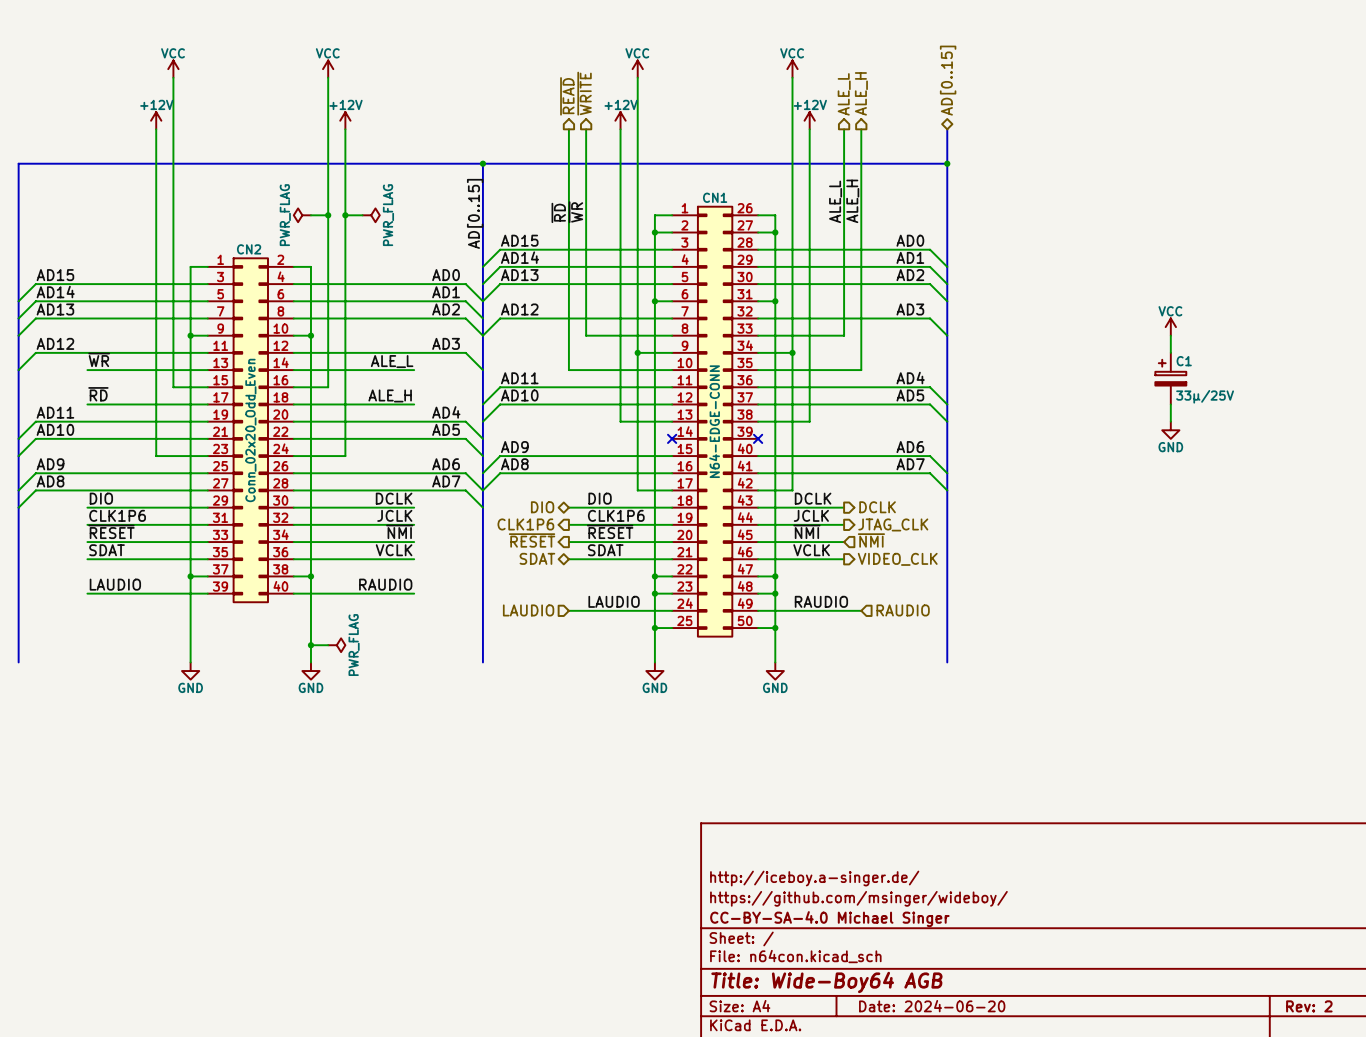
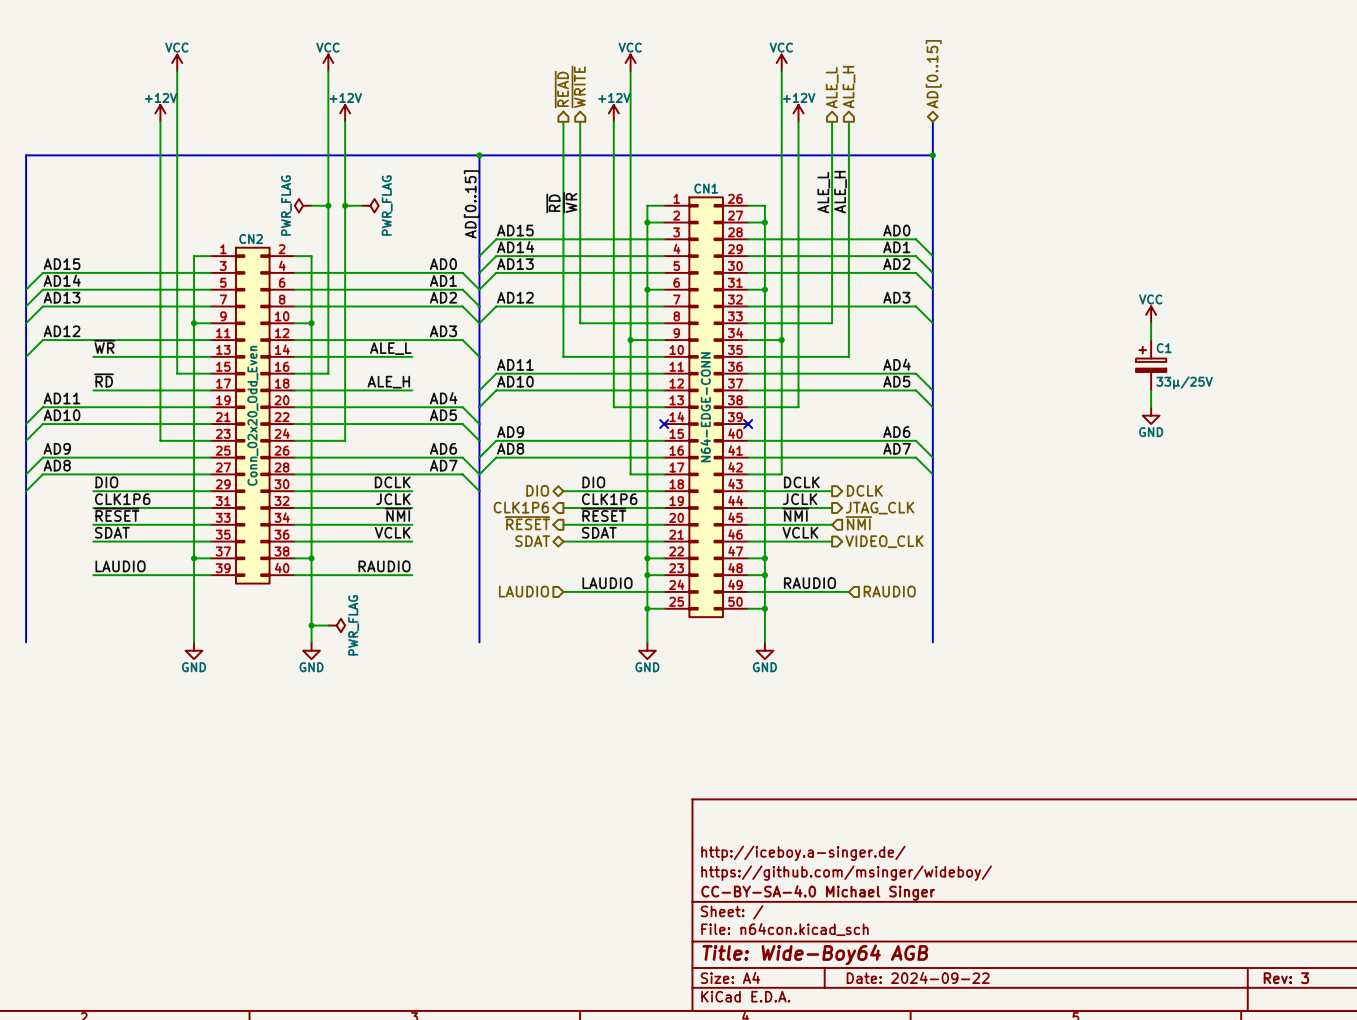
title block: Date: 2024-06-20 (932, 1006) -> Date: 2024-09-22 (918, 977)
title block: Rev: 2 (1309, 1006) -> Rev: 3 (1286, 978)

